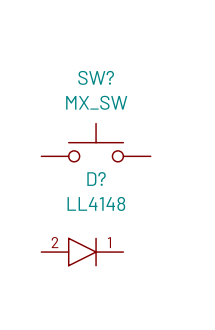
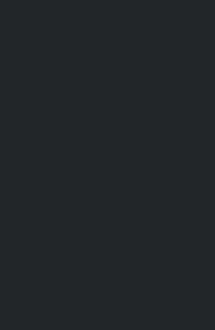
SW?: MX_SW (96, 142) -> none
D?: LL4148 (82, 252) -> none

